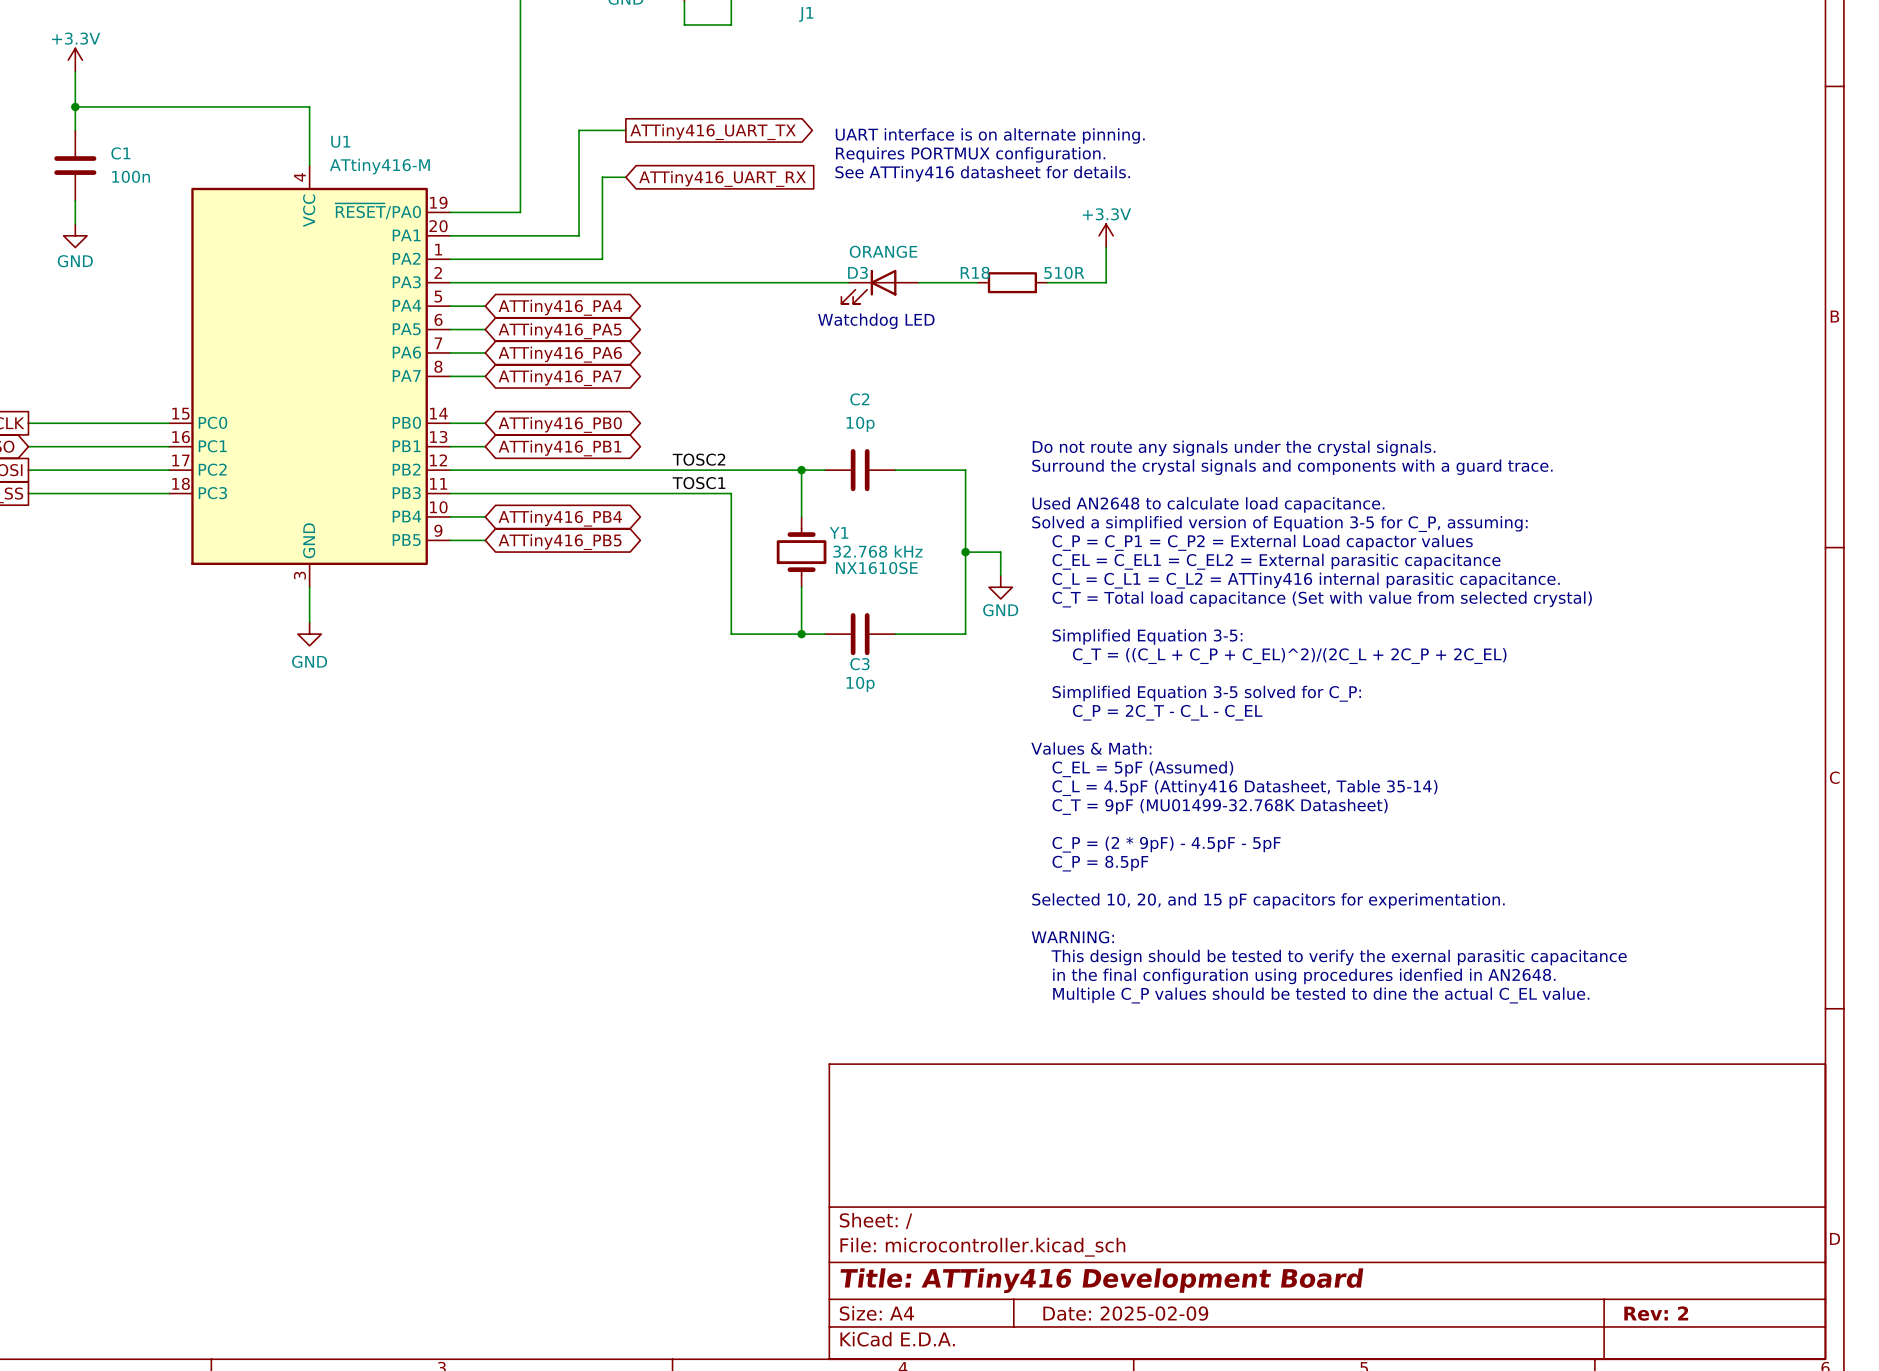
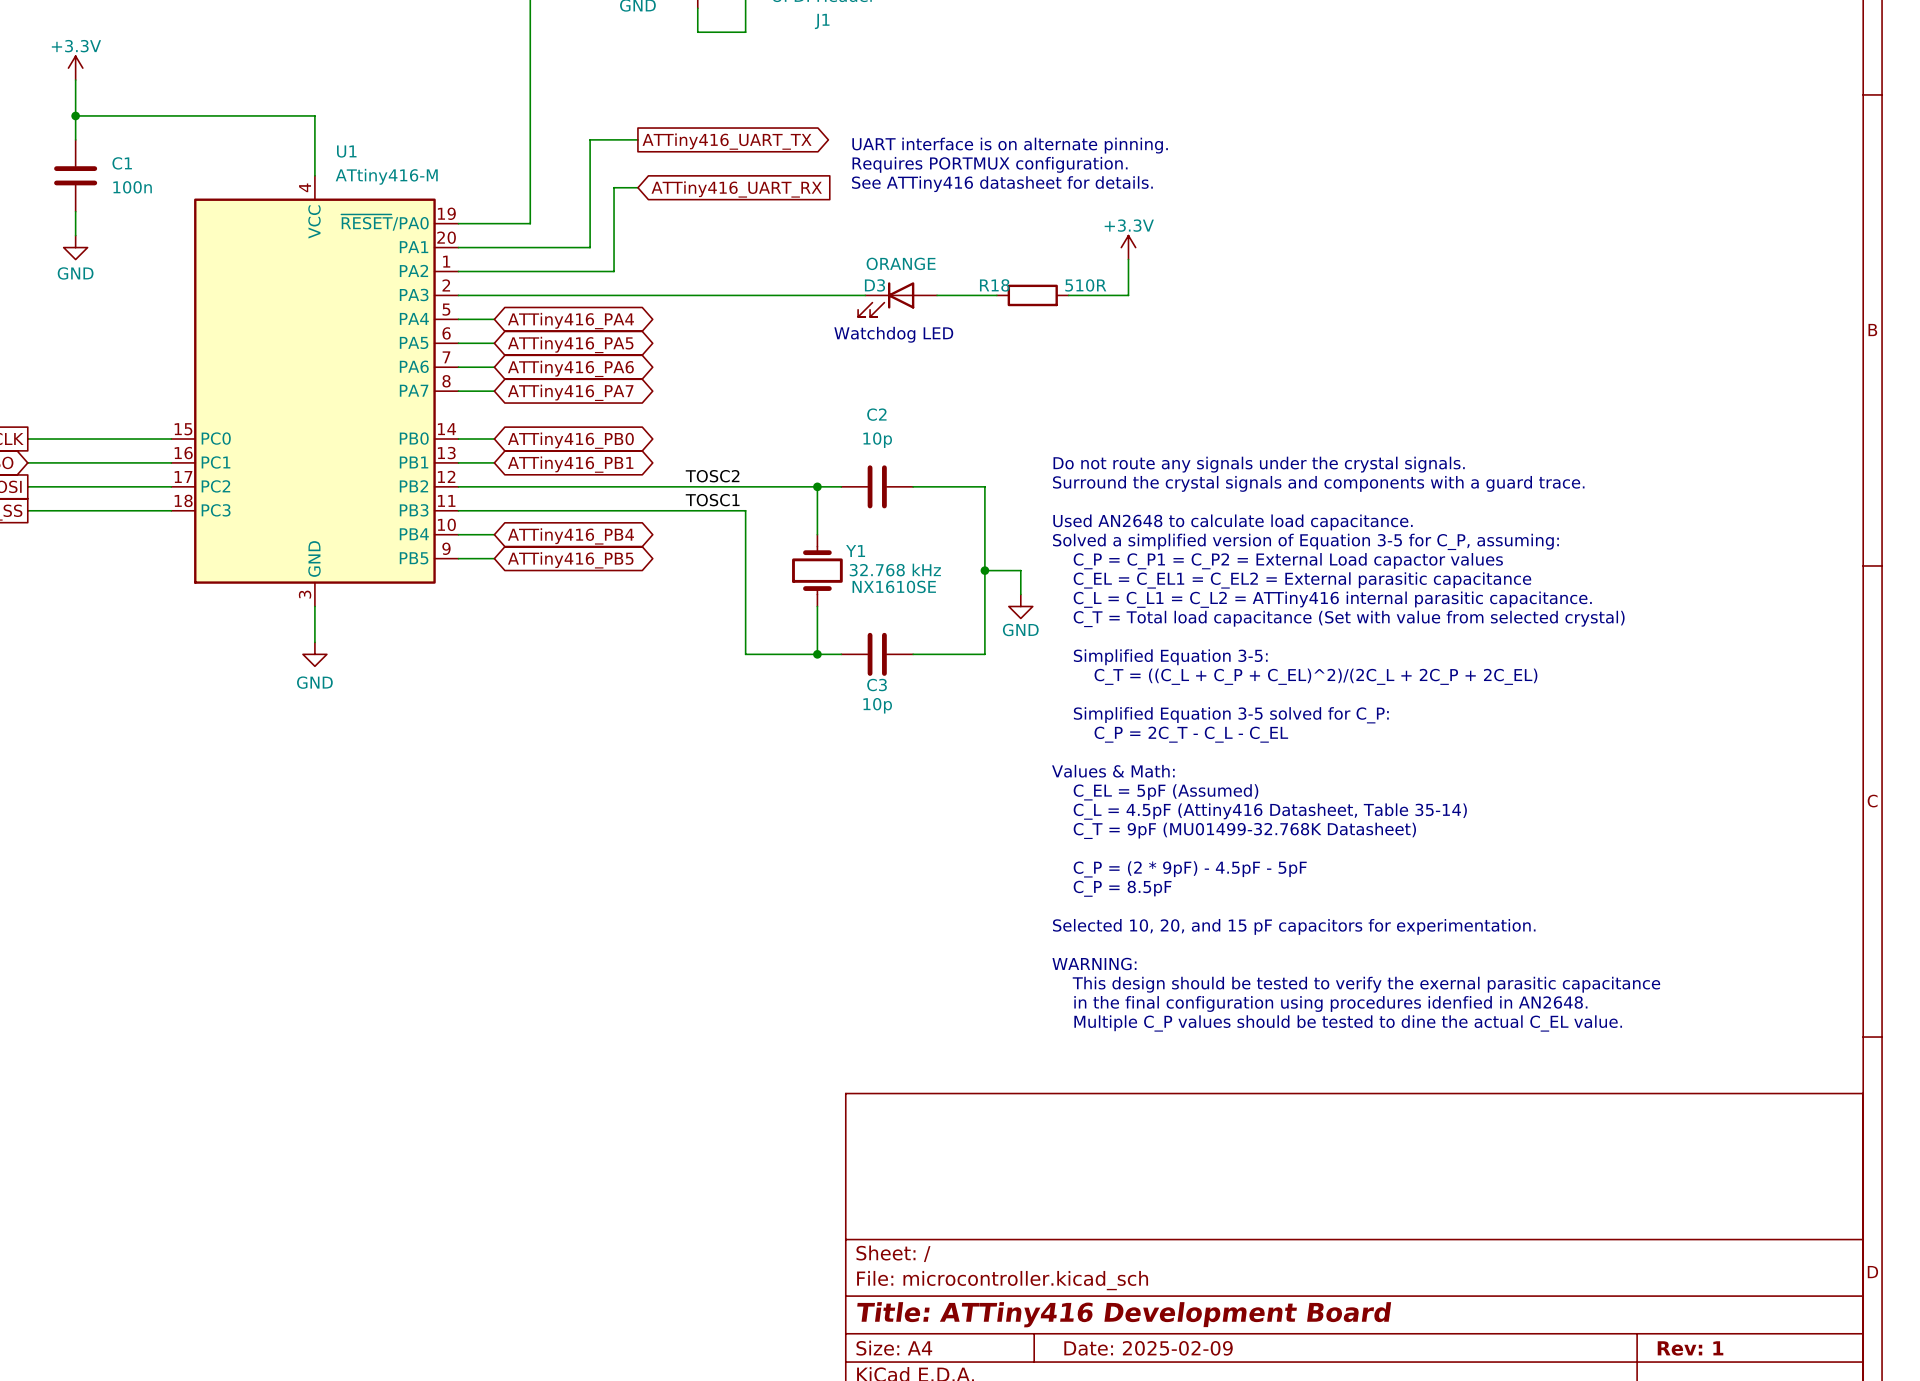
title block: Rev: 2 (1656, 1313) -> Rev: 1 (1690, 1348)

